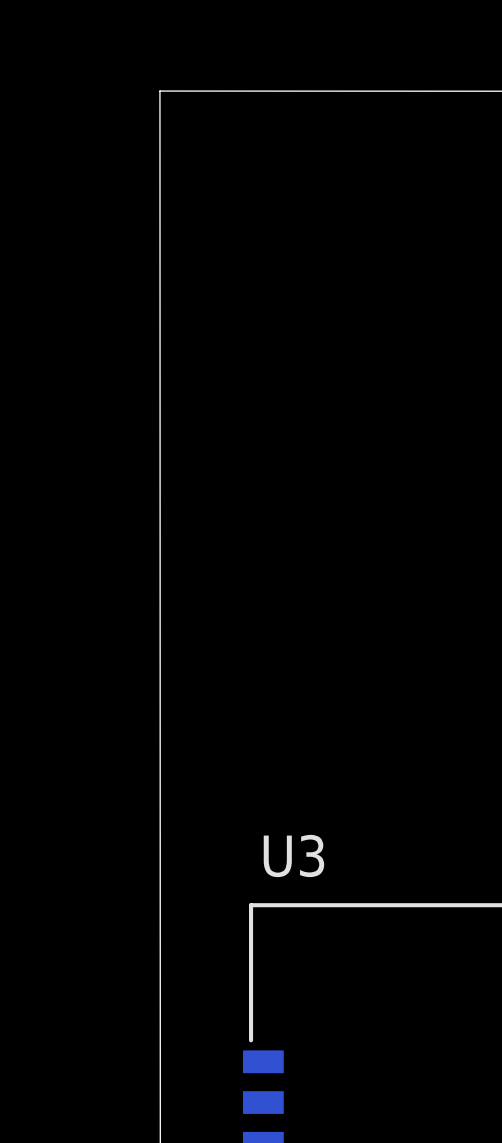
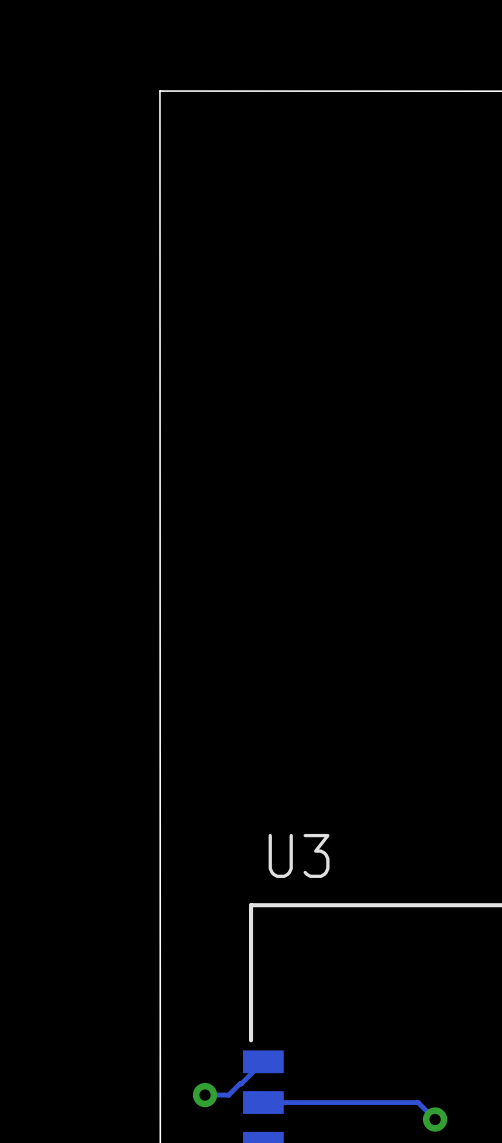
track: none -> (263, 1061) (228, 1095) (205, 1095)
via: none -> (205, 1095)
track: none -> (263, 1102) (418, 1102) (435, 1119)
via: none -> (435, 1119)

